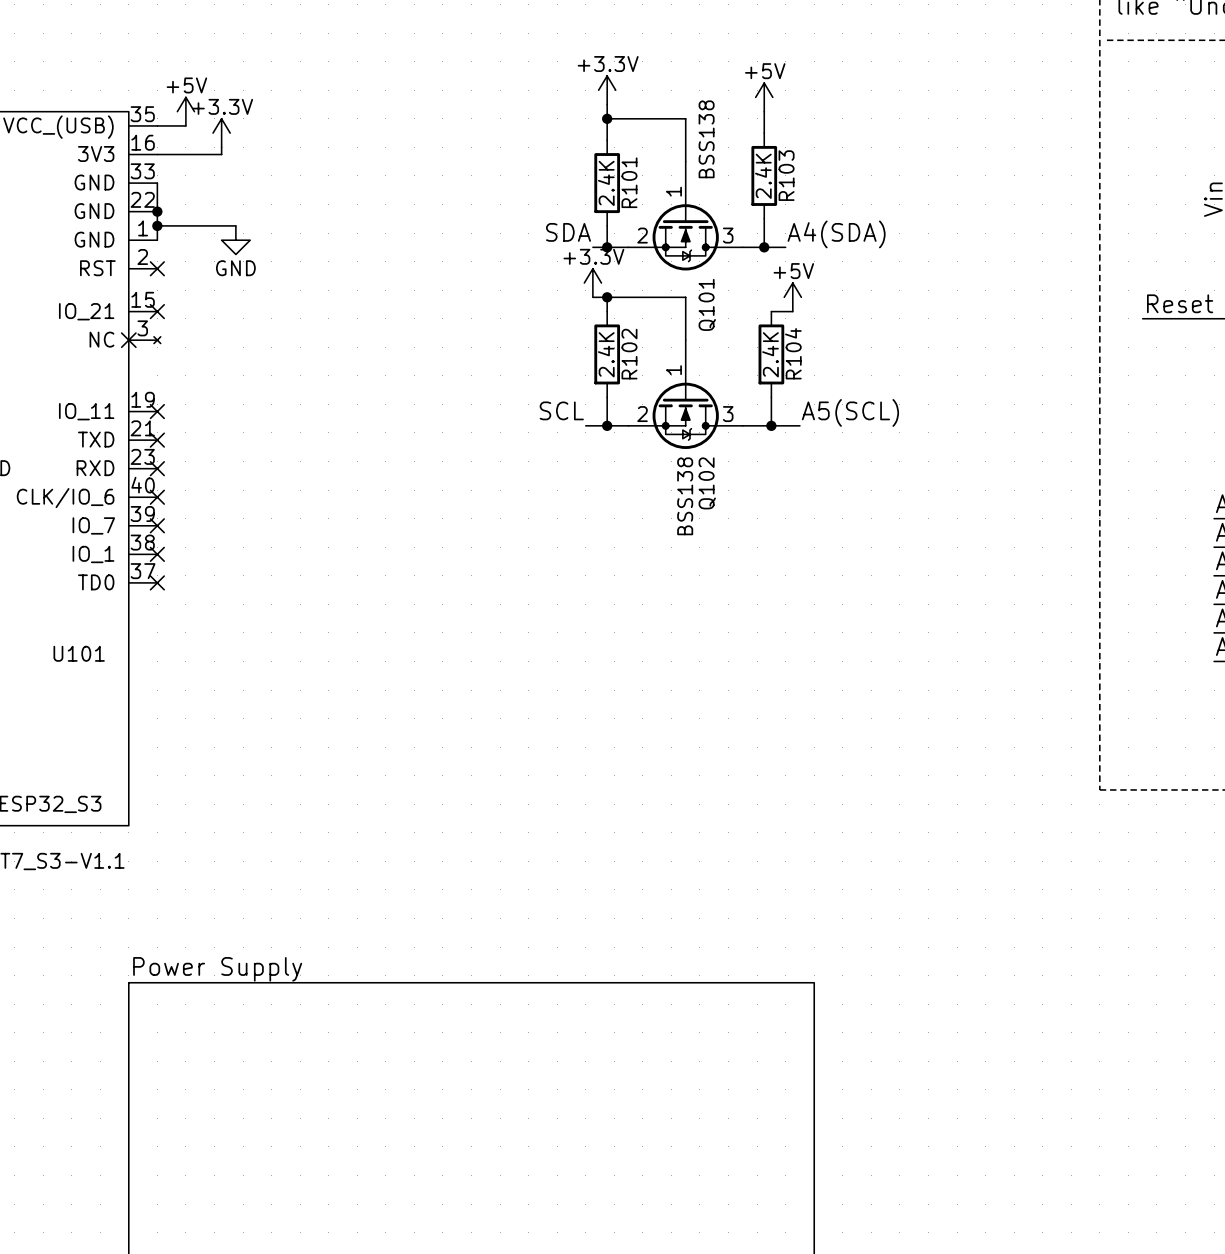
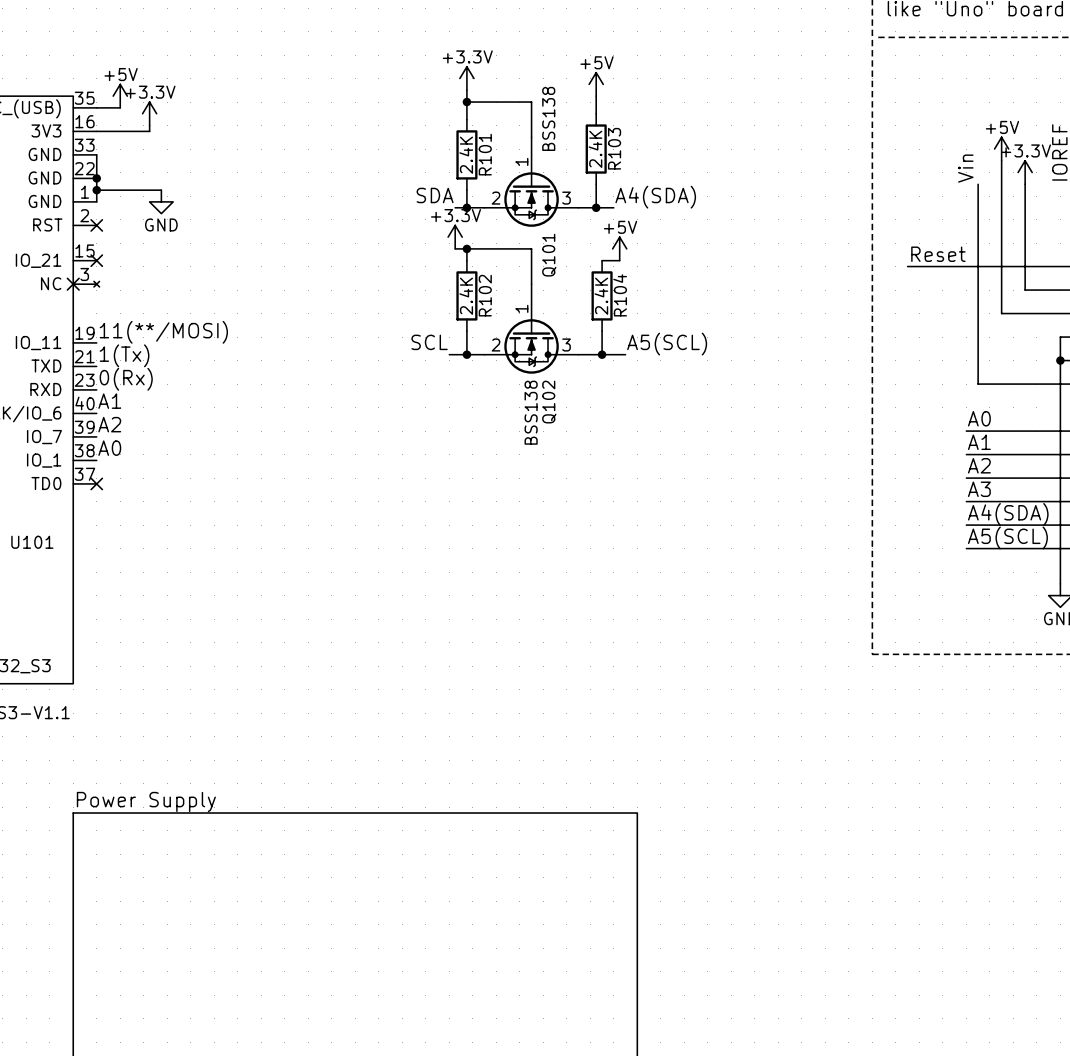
label: none -> 11(**/MOSI) (163, 332)
no-connect mark: (157, 411) -> none
label: none -> 1(Tx) (124, 355)
no-connect mark: (157, 440) -> none
label: none -> 0(Rx) (126, 379)
no-connect mark: (157, 468) -> none
label: none -> A1 (109, 401)
no-connect mark: (157, 497) -> none
label: none -> A2 (109, 424)
no-connect mark: (157, 525) -> none
label: none -> A0 (109, 448)
no-connect mark: (157, 554) -> none

